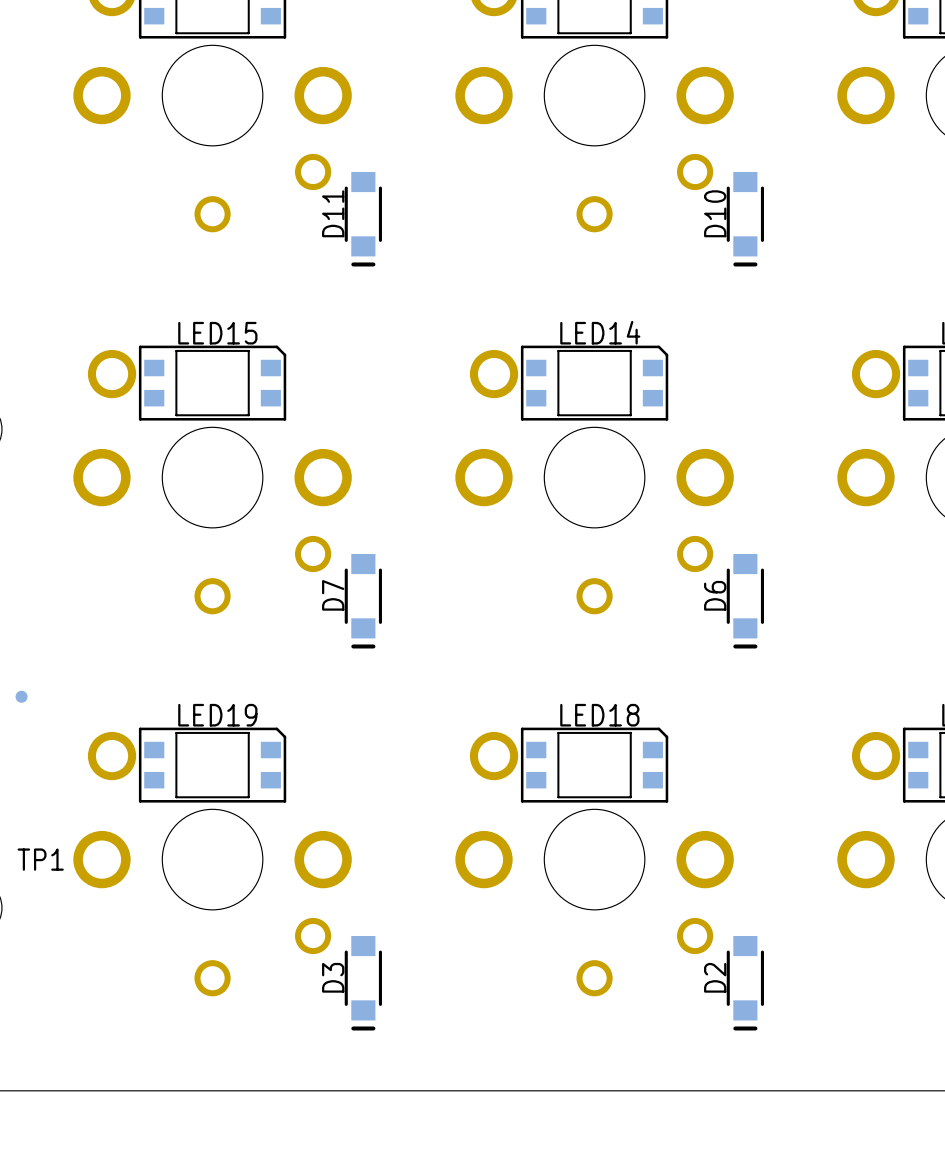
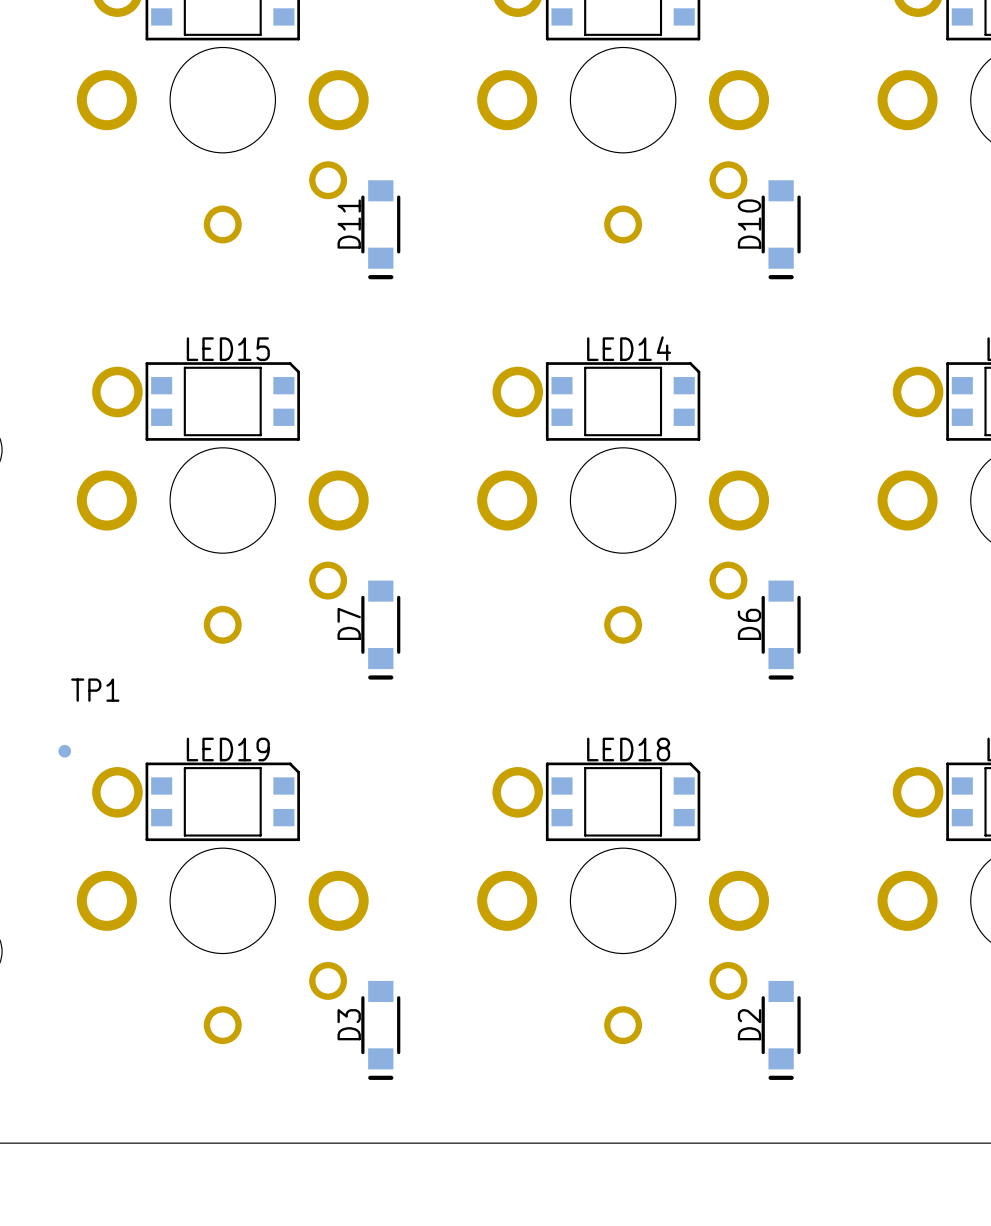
TP1 position: (21, 696) -> (64, 751)
TP1 name position: TP1 (40, 859) -> TP1 (95, 690)

